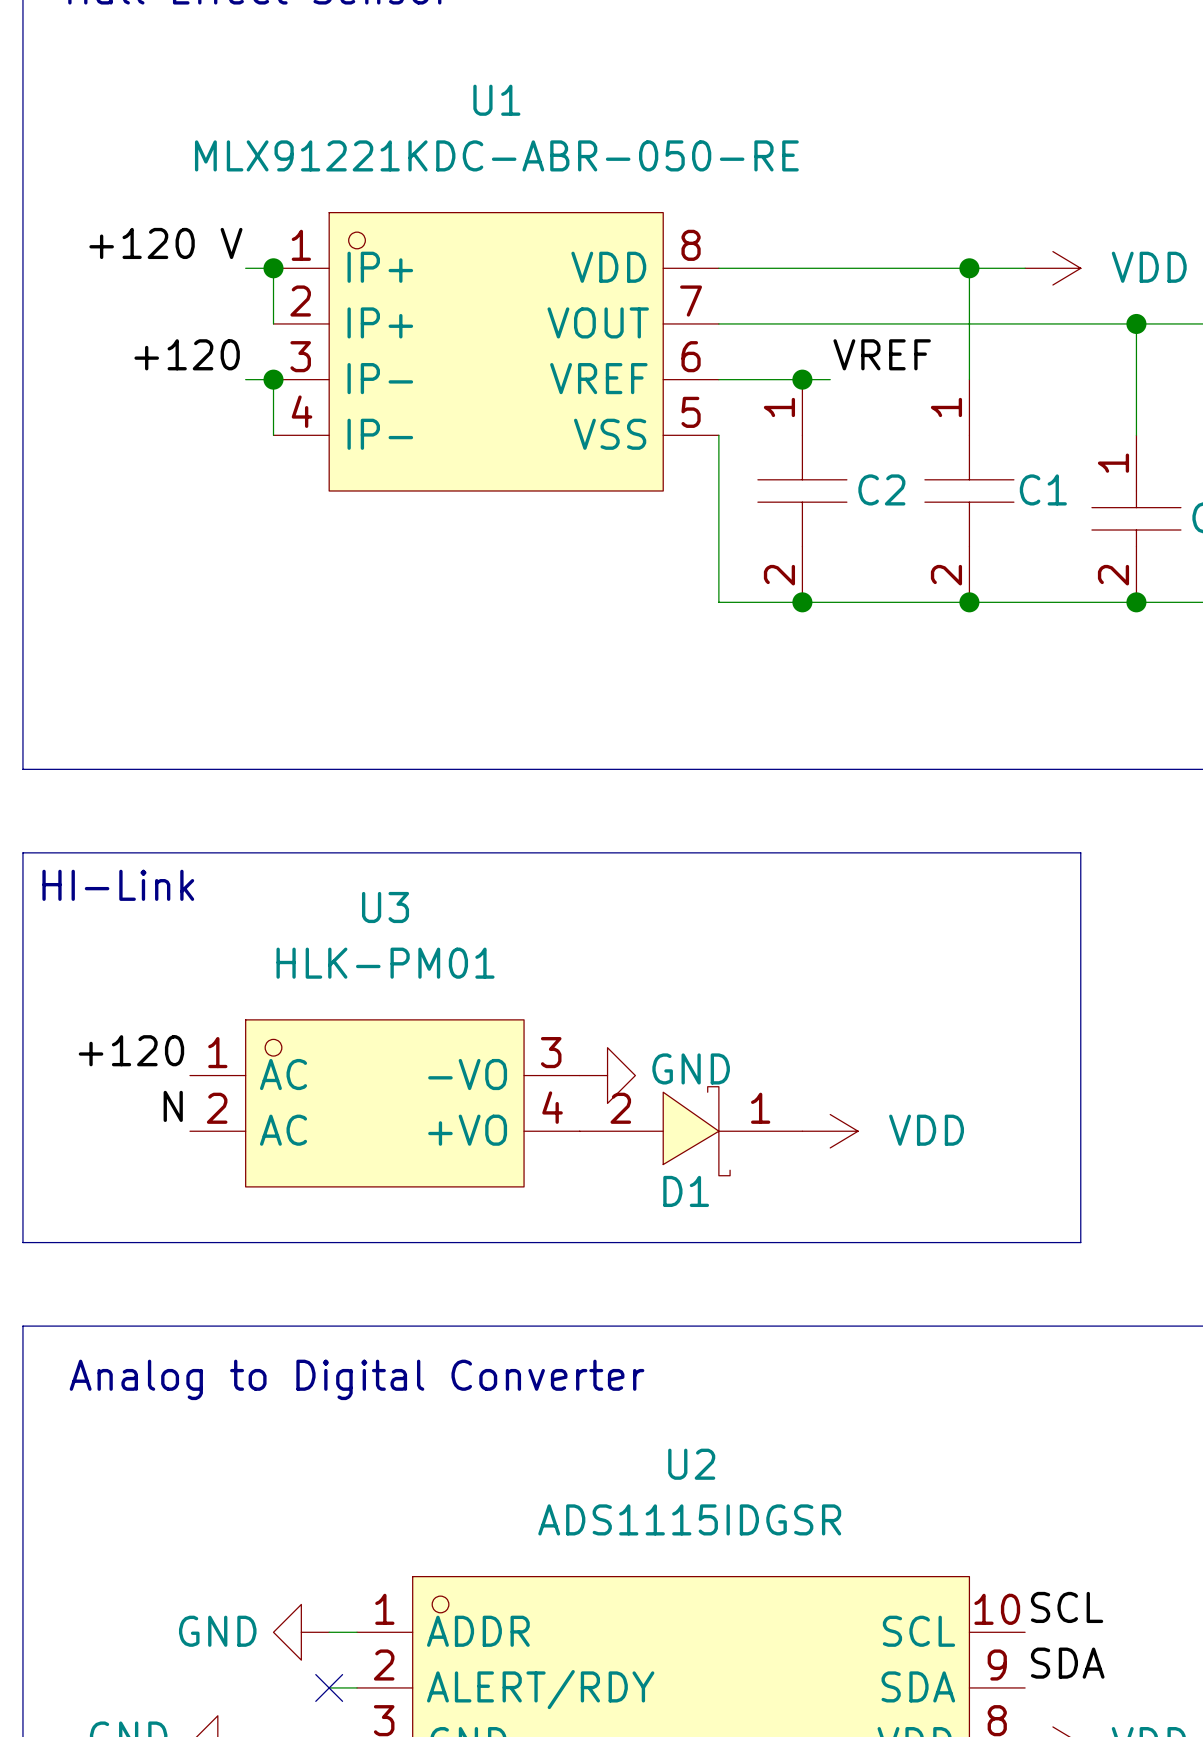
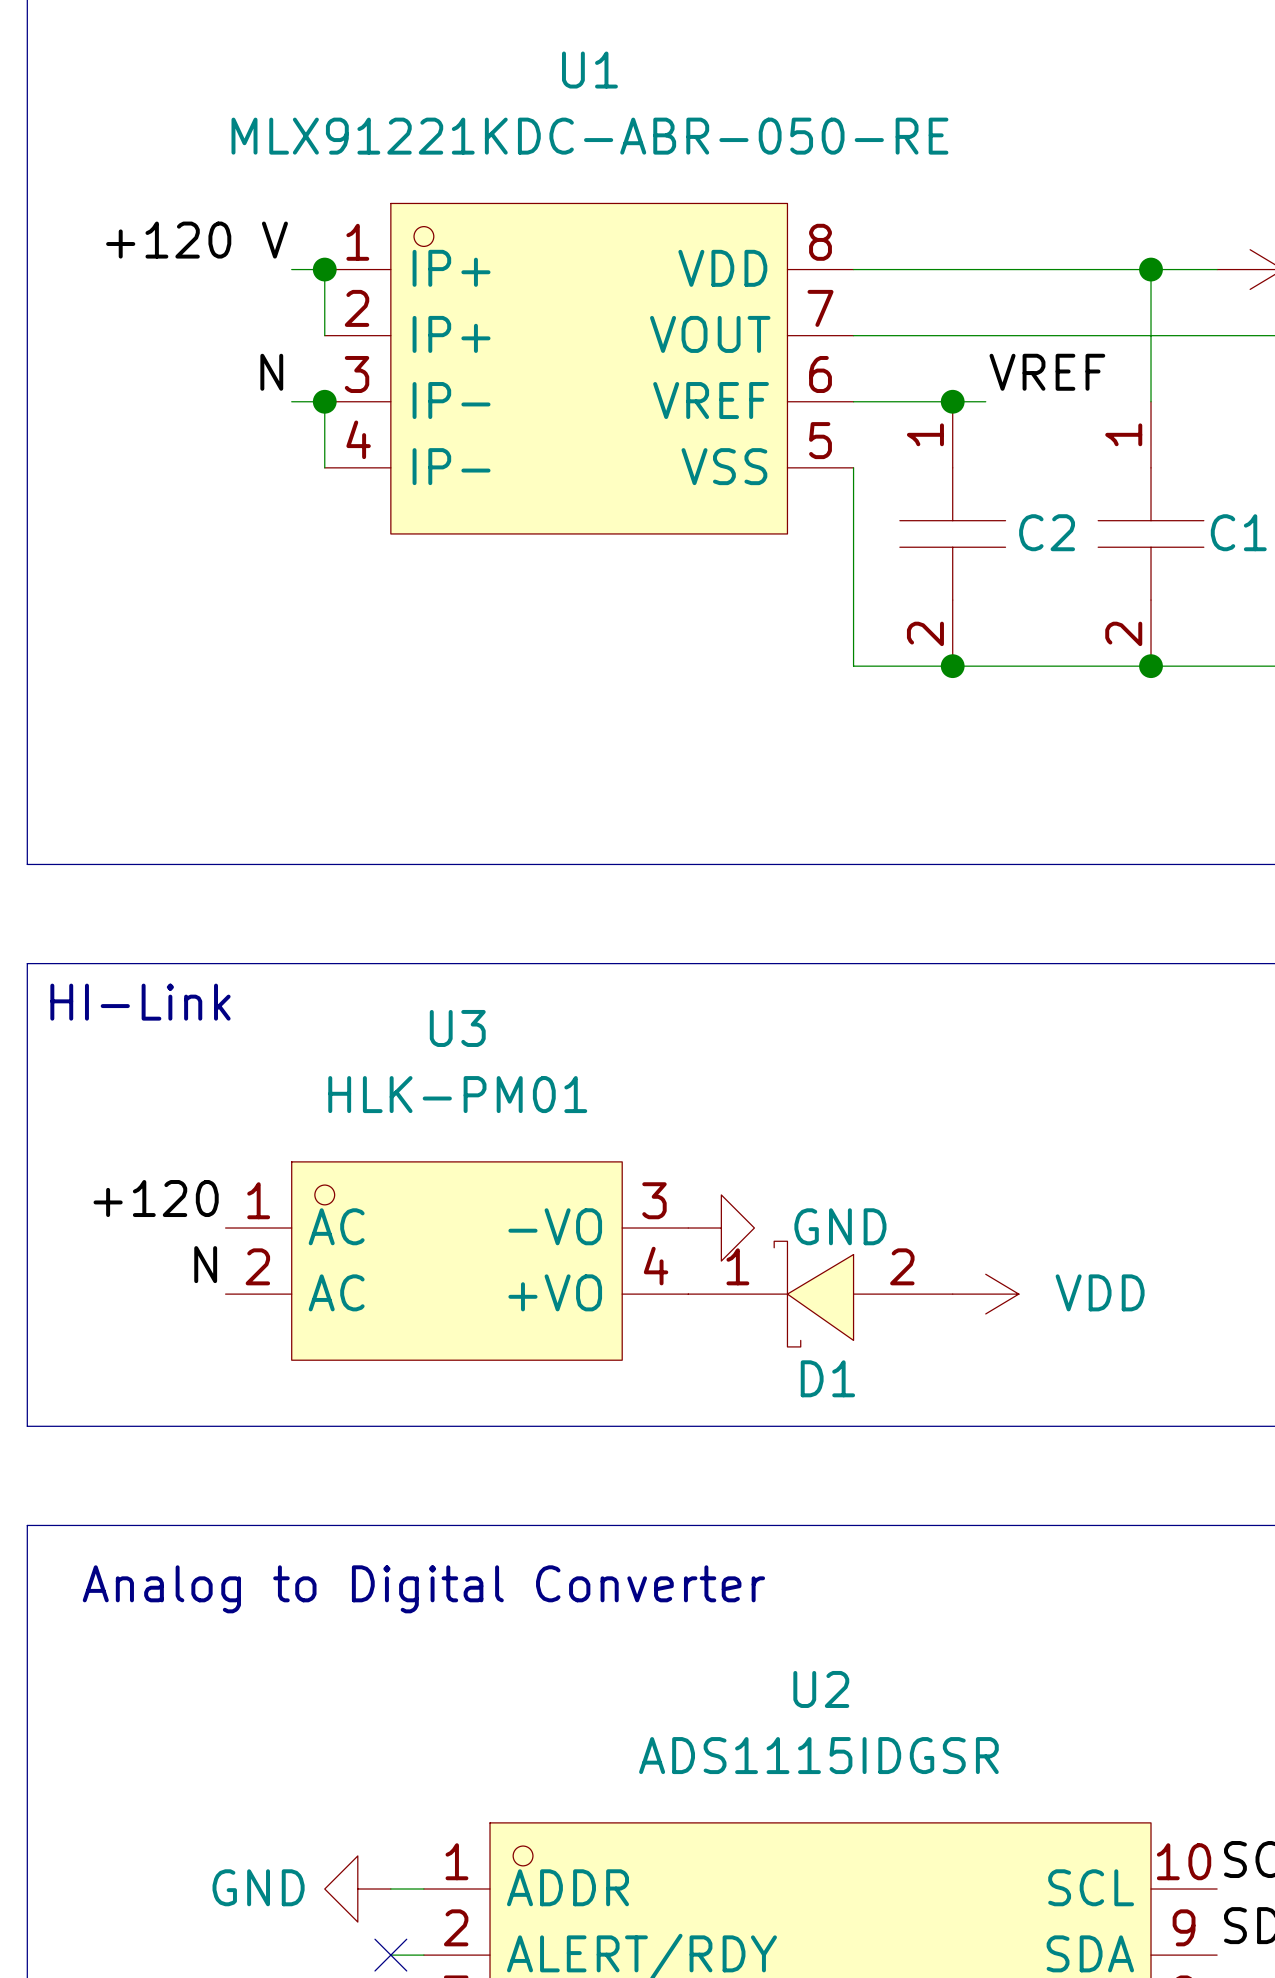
label: +120 (187, 354) -> N (271, 372)
power symbol text position: GND (691, 1068) -> GND (840, 1226)
D1 rotation: 0° (696, 1131) -> 180° (813, 1294)

